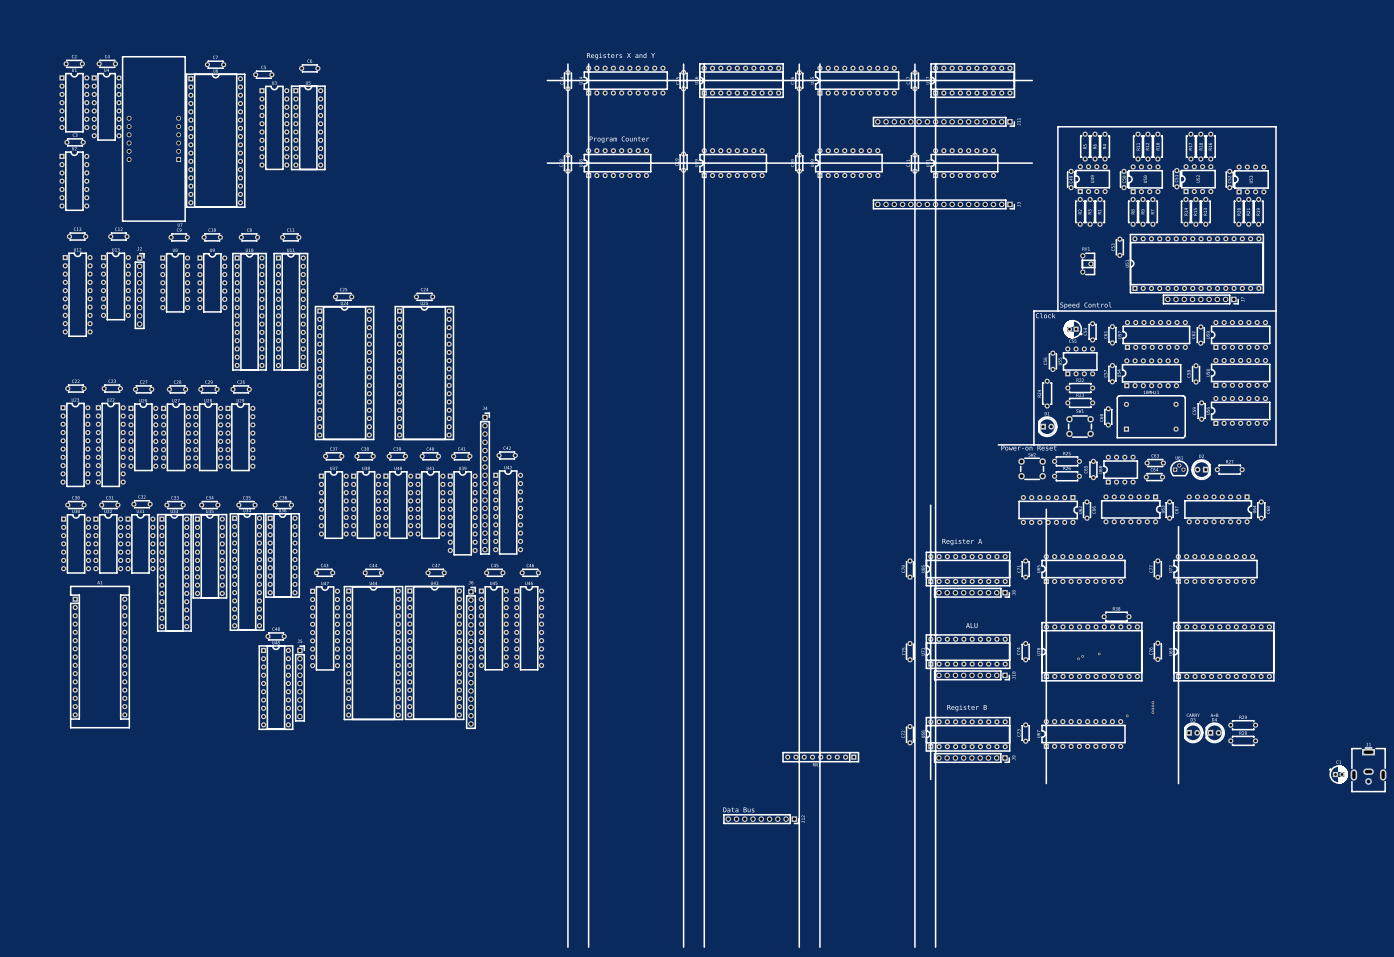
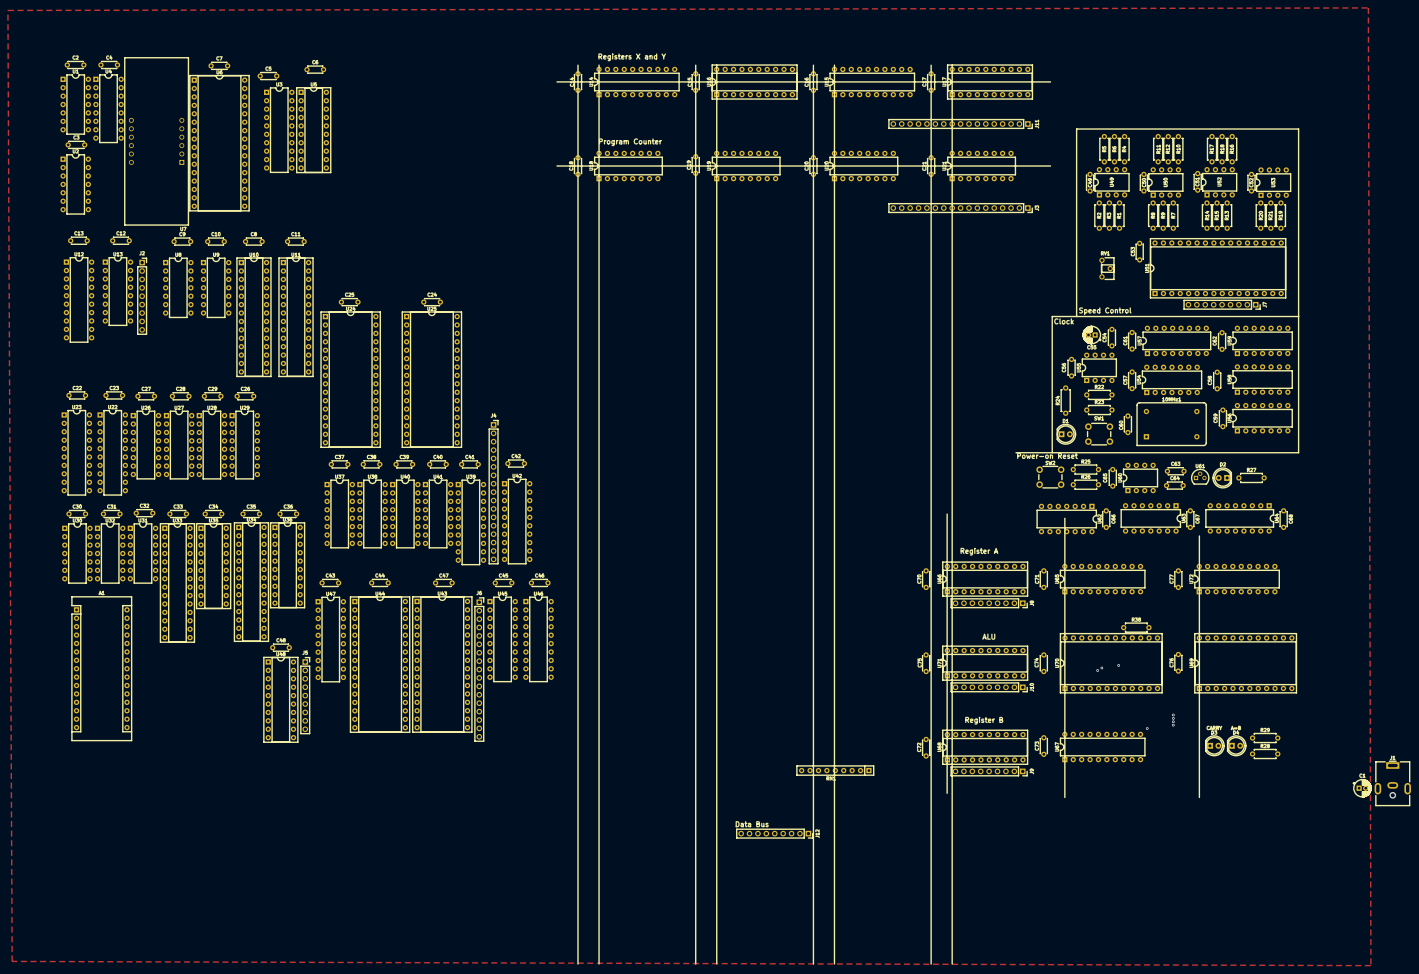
zone outline: none -> (1368, 7) (7, 10) (12, 961) (1370, 965) (1368, 7)

